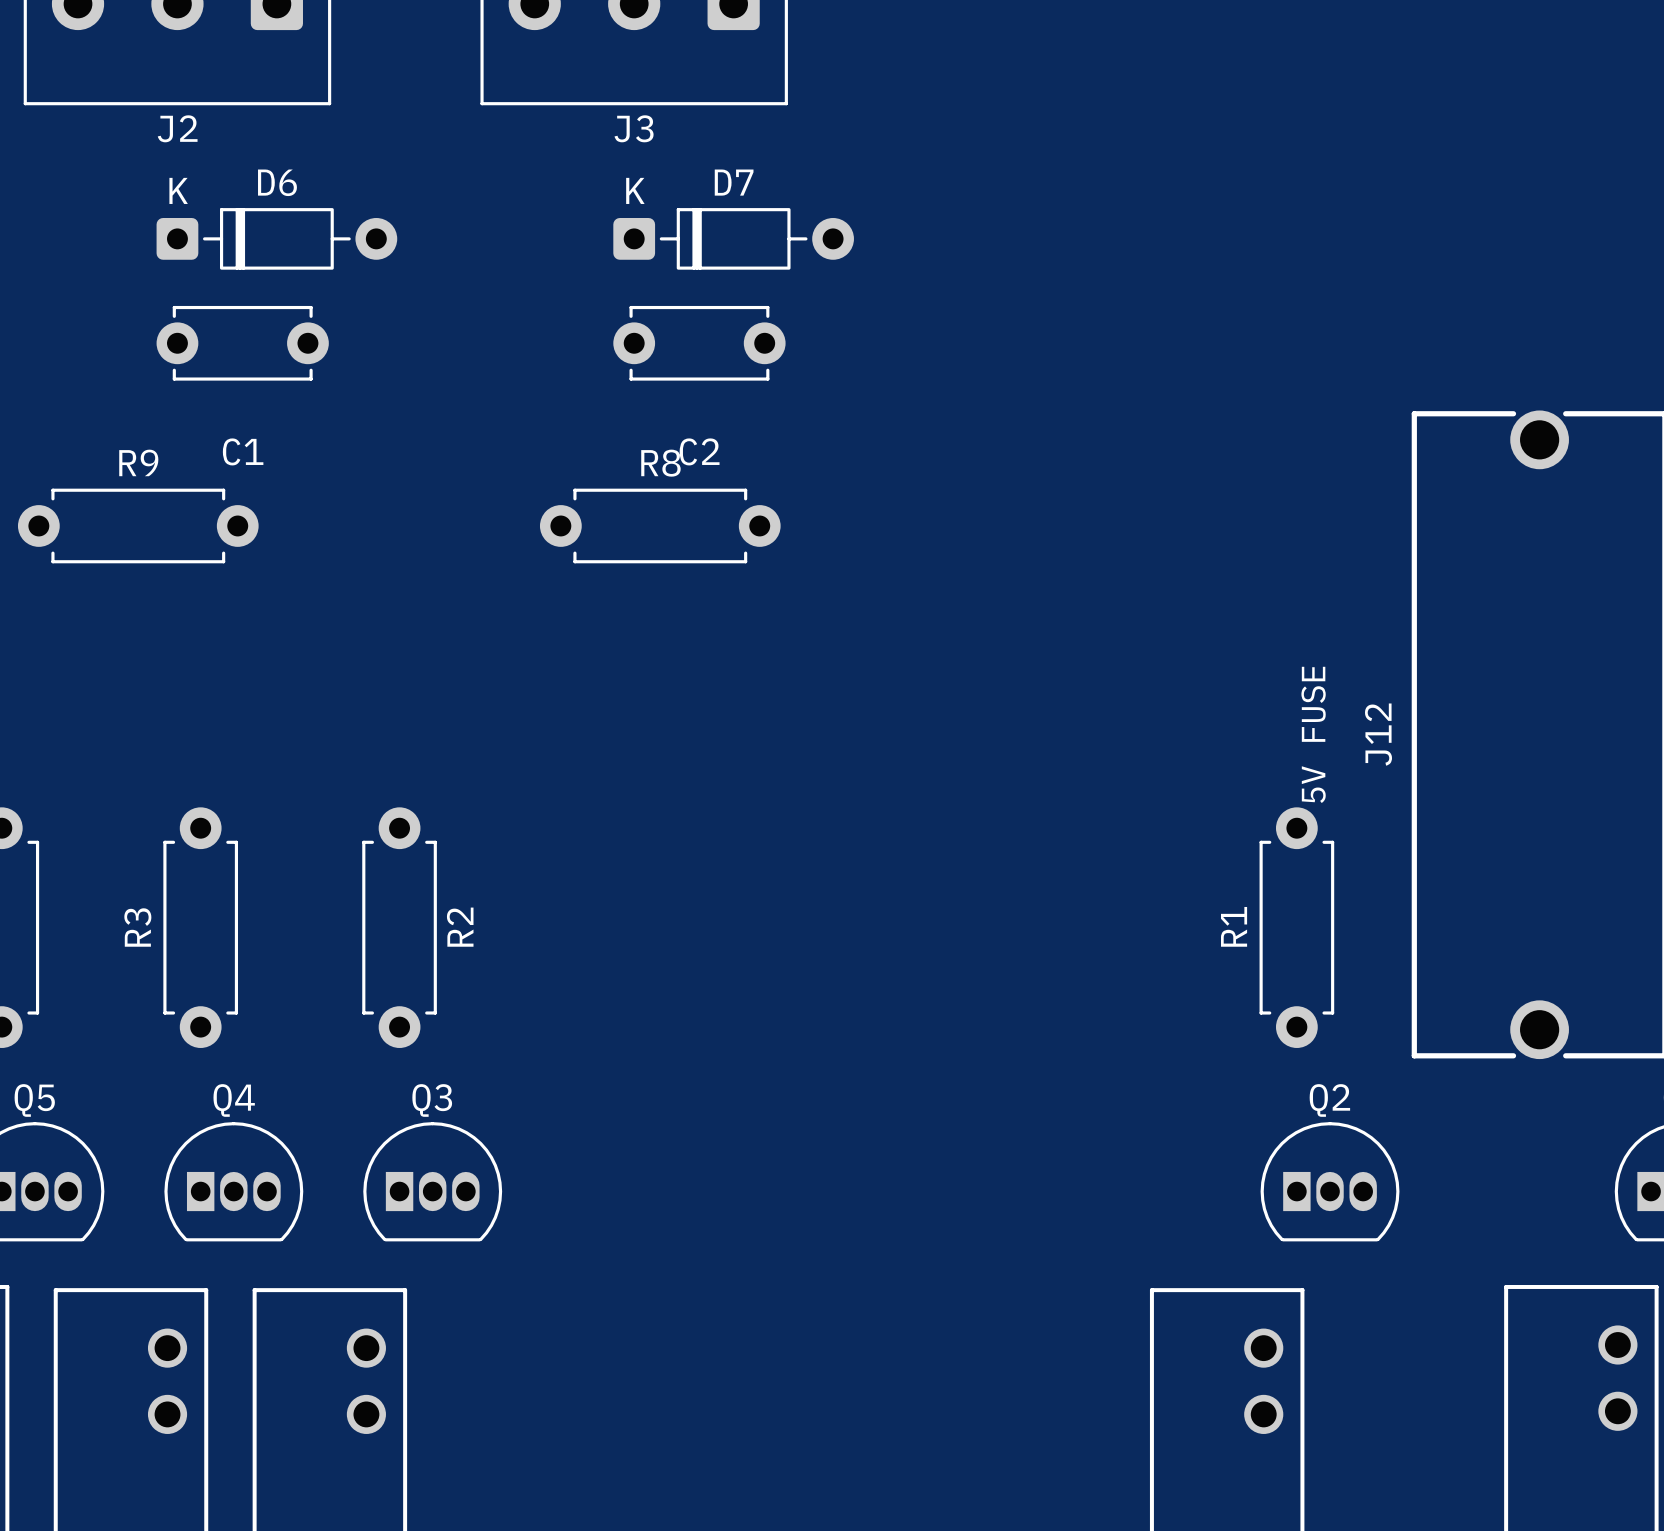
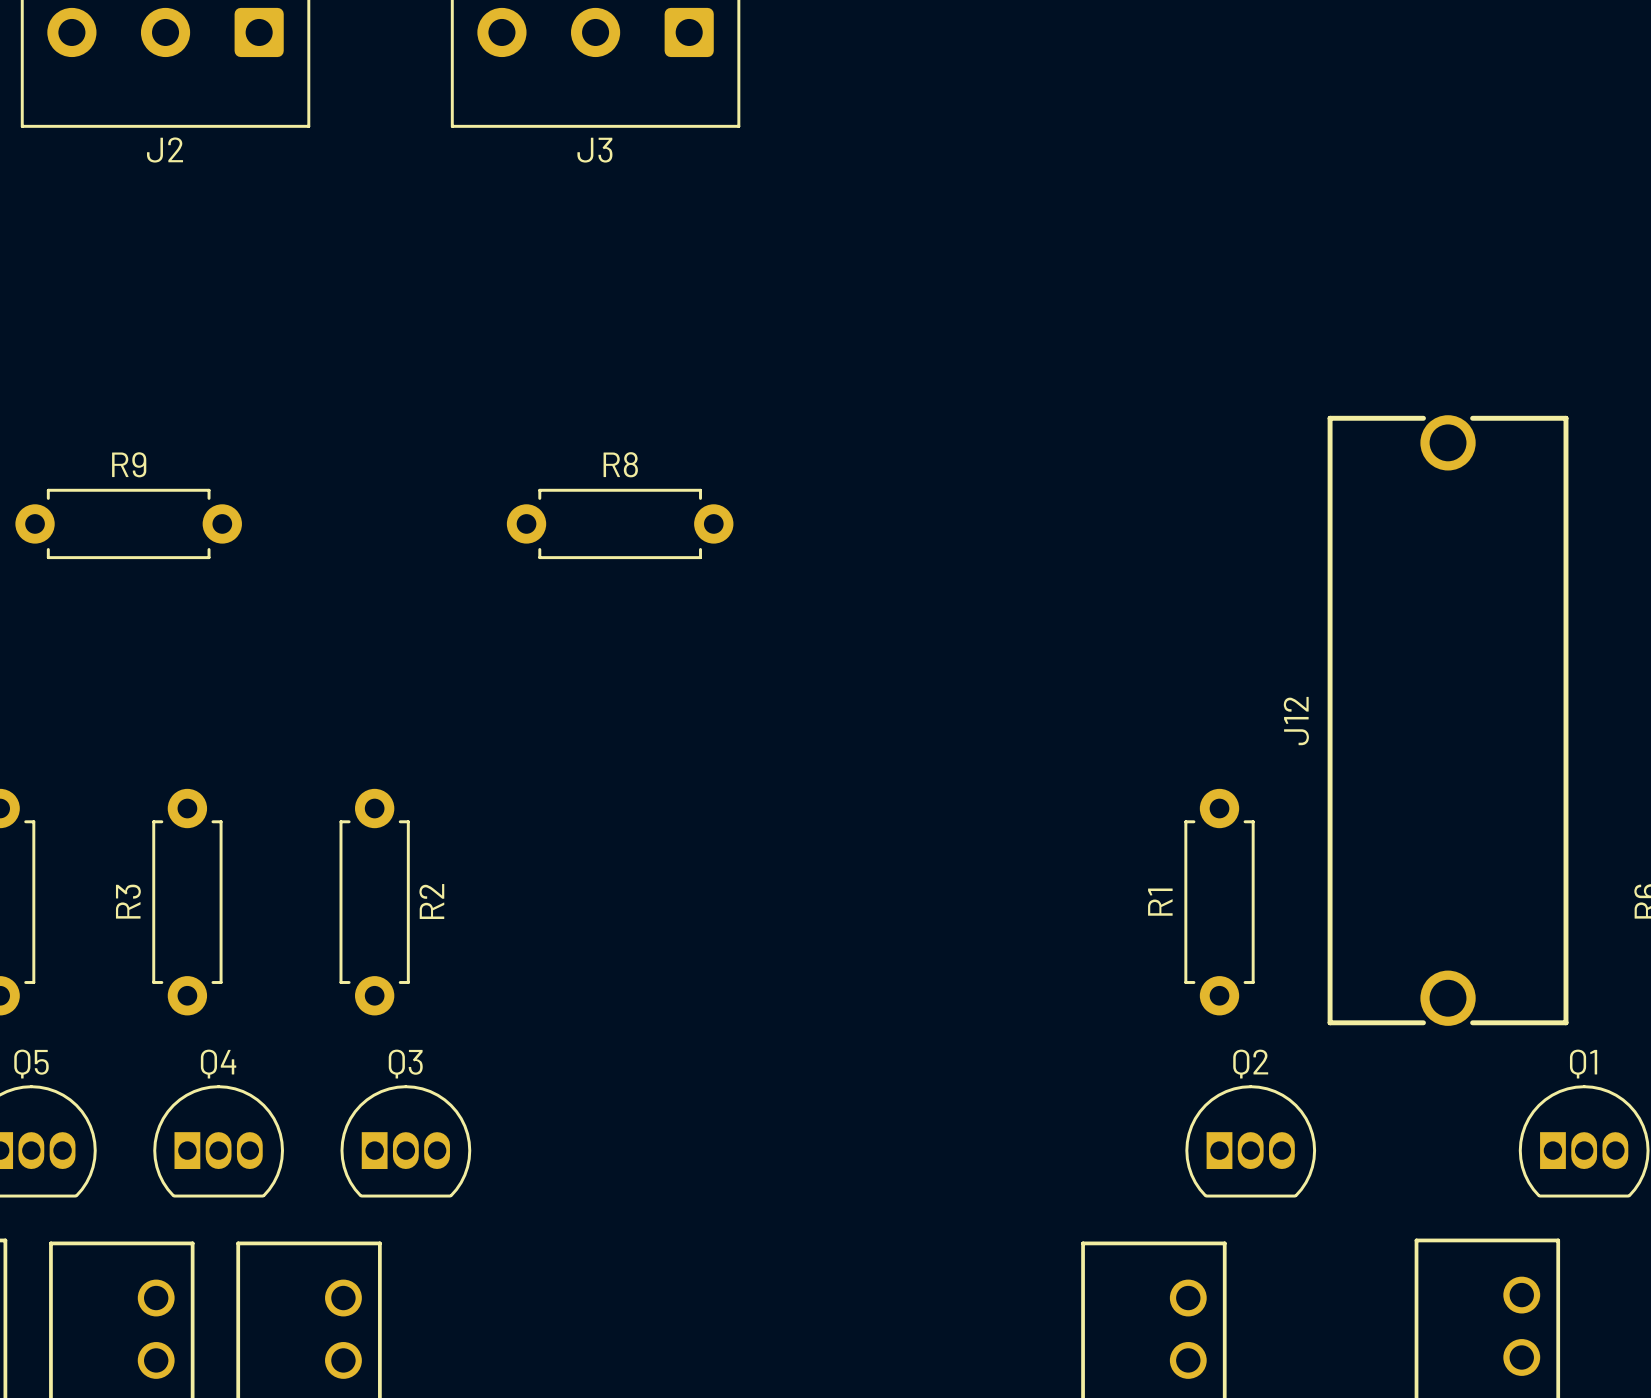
D6: (276, 238) -> none
D7: (733, 238) -> none
C1: (242, 343) -> none
C2: (699, 343) -> none
text: 5V FUSE (1313, 734) -> none

